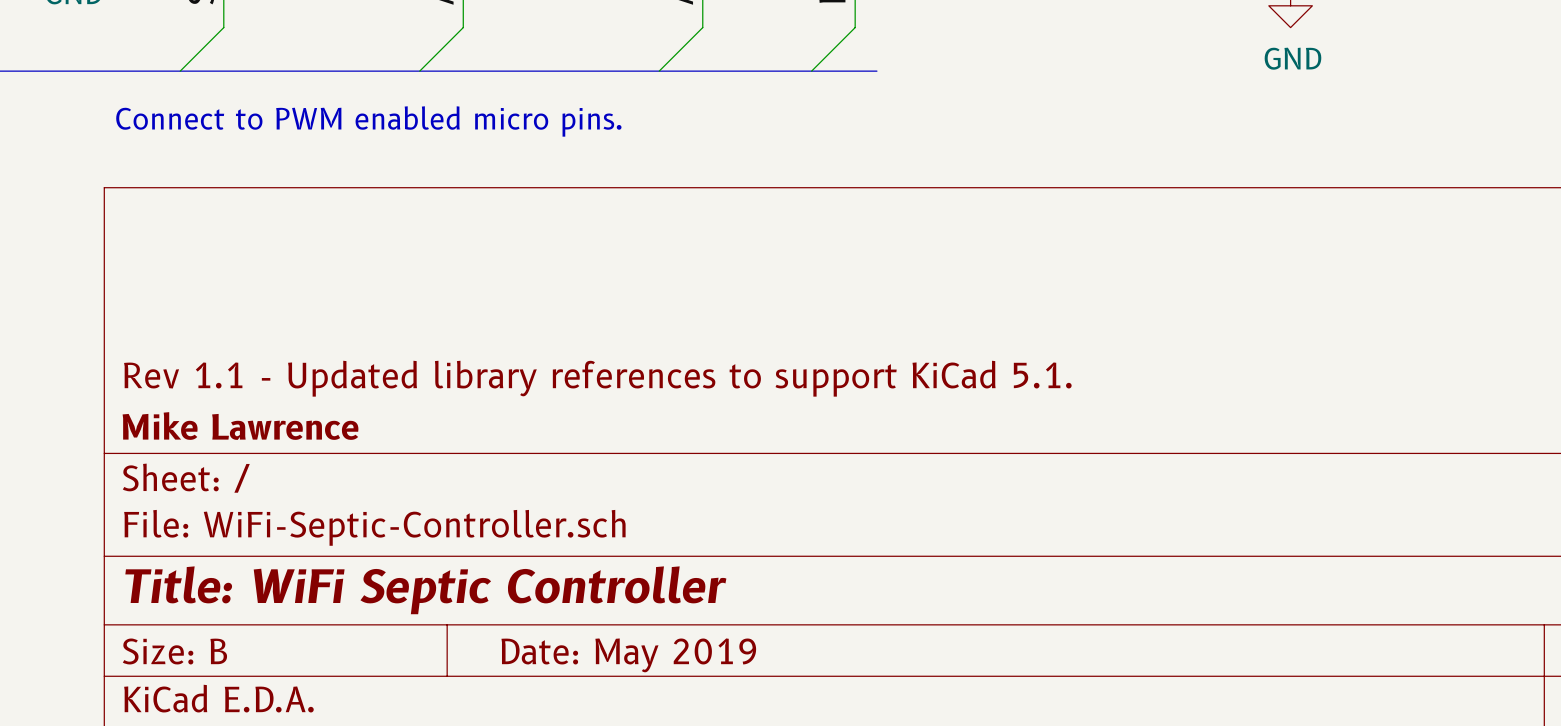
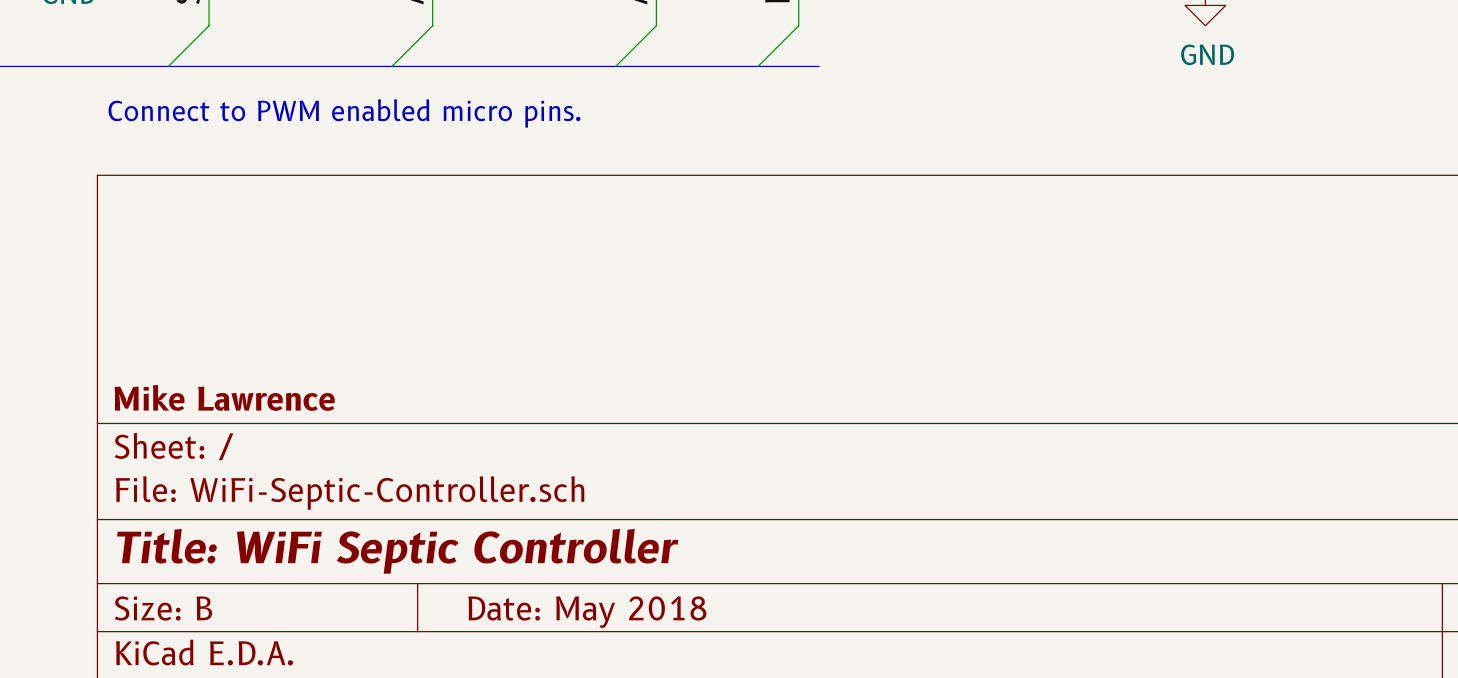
title block: Rev 1.1 - Updated library references to support KiCad 5.1. (597, 378) -> none
title block: Date: May 2019 (628, 655) -> Date: May 2018 (587, 612)

